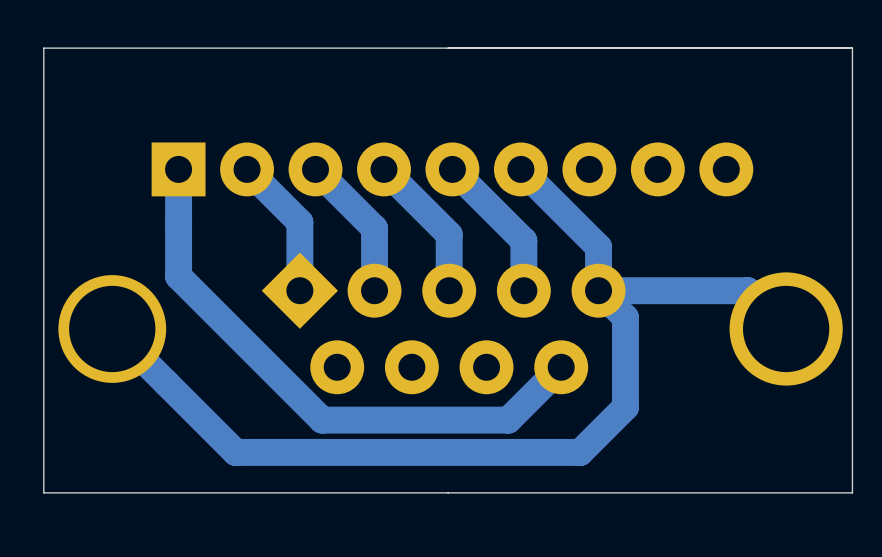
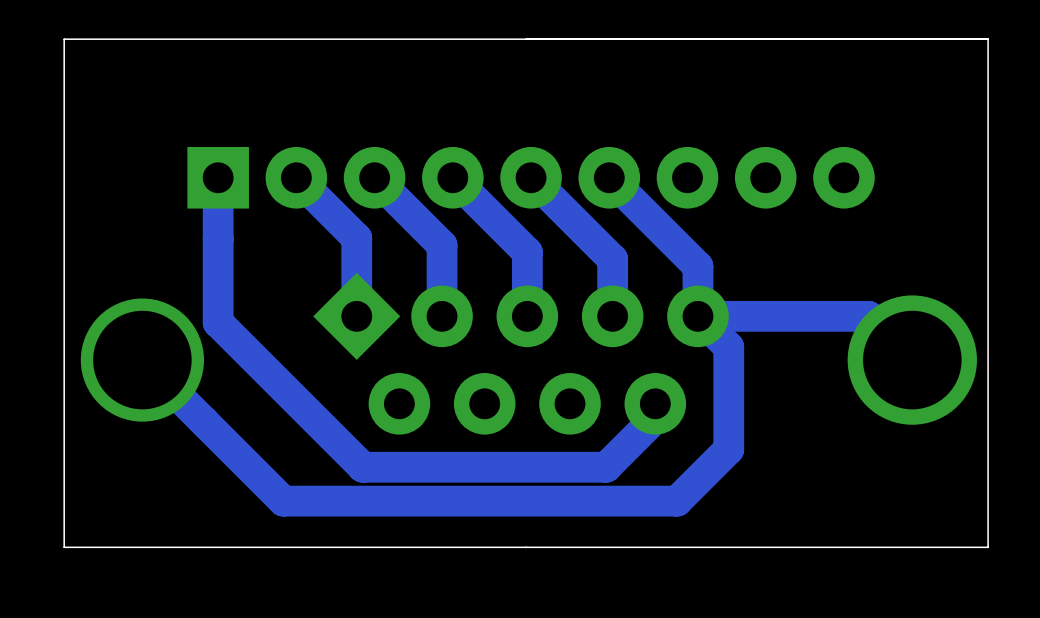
track: (178, 276) (322, 420) (508, 420) (561, 367) -> (218, 300) (218, 322) (362, 467) (606, 467) (655, 418) (655, 403)

